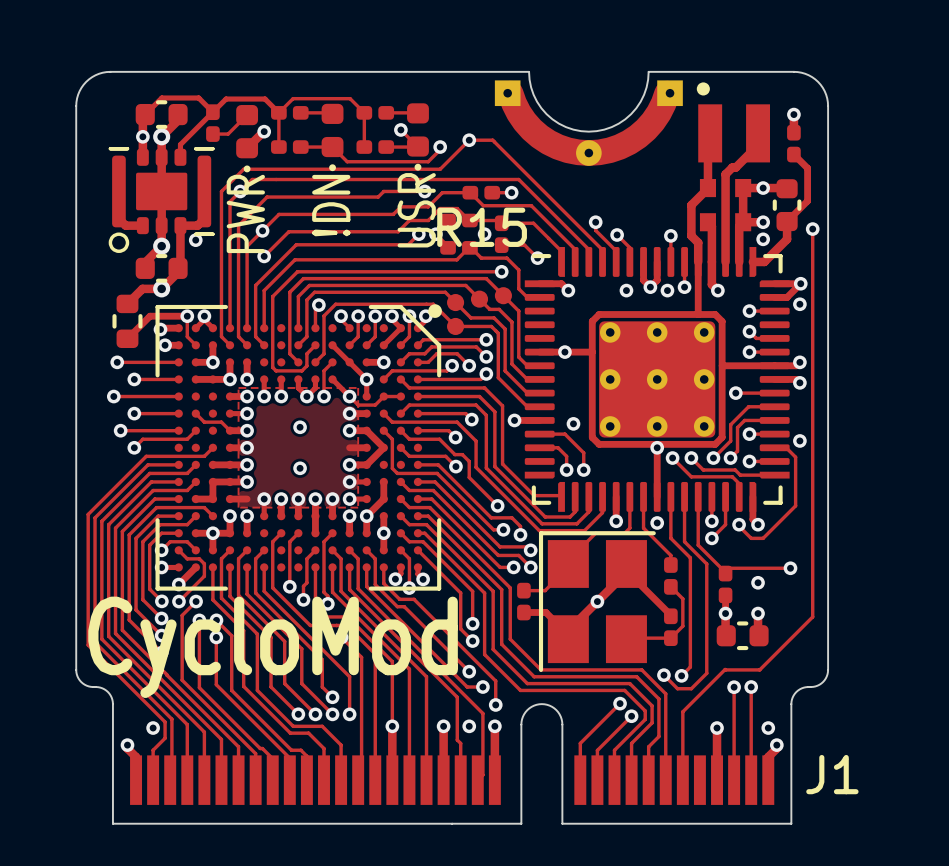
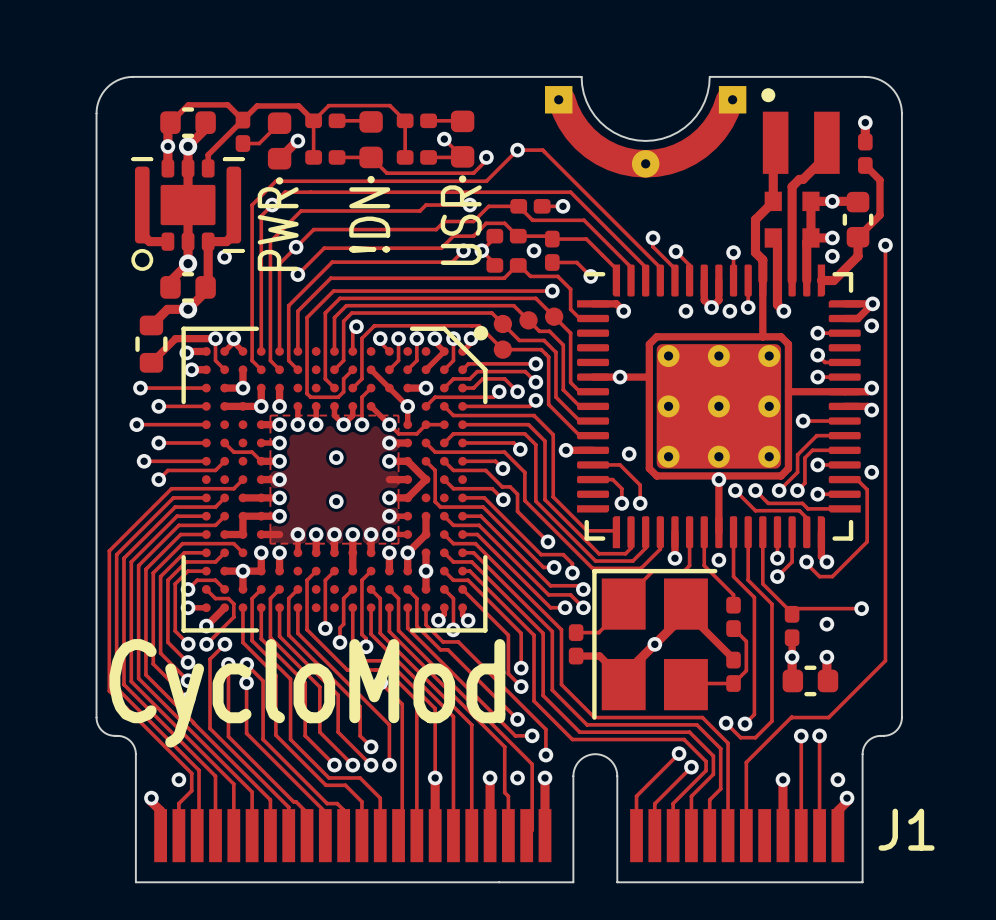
R15 name: R15 (482, 227) -> none

